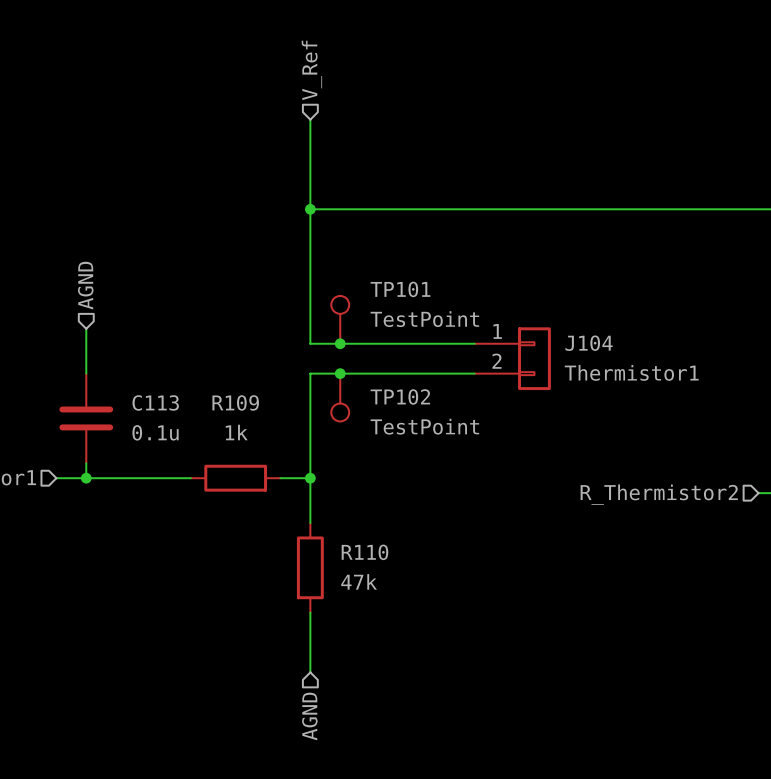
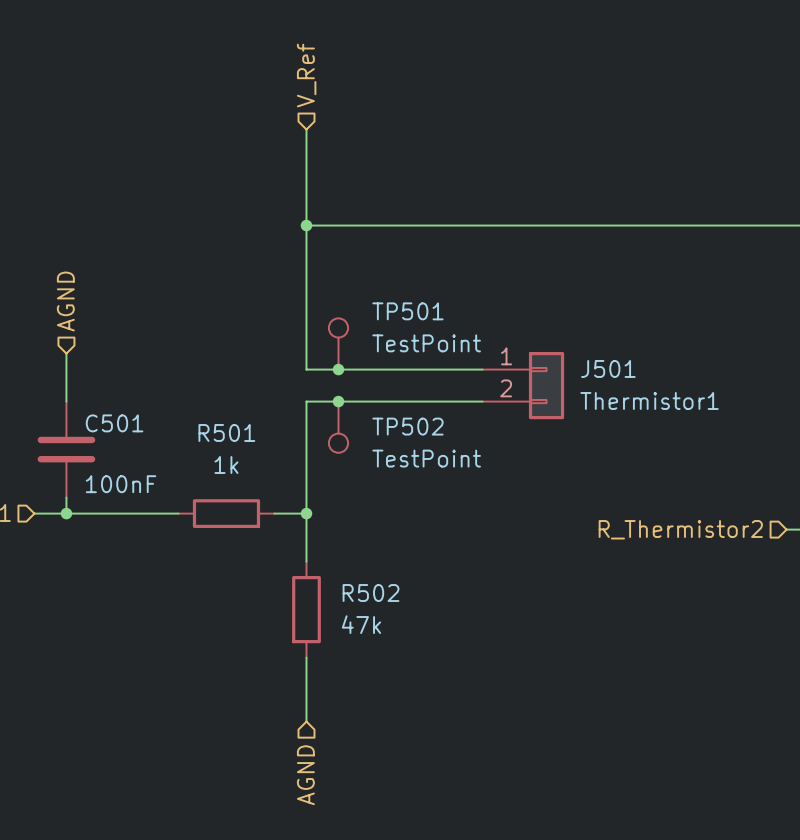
TP101 name: TP101 (400, 289) -> TP501 (407, 311)
J104 name: J104 (589, 343) -> J501 (608, 368)
TP102 name: TP102 (400, 396) -> TP502 (407, 426)
C113 name: C113 (155, 402) -> C501 (114, 423)
R109 name: R109 (235, 402) -> R501 (226, 432)
C113 value: 0.1u (155, 432) -> 100nF (121, 484)
R110 name: R110 (364, 552) -> R502 (371, 593)

